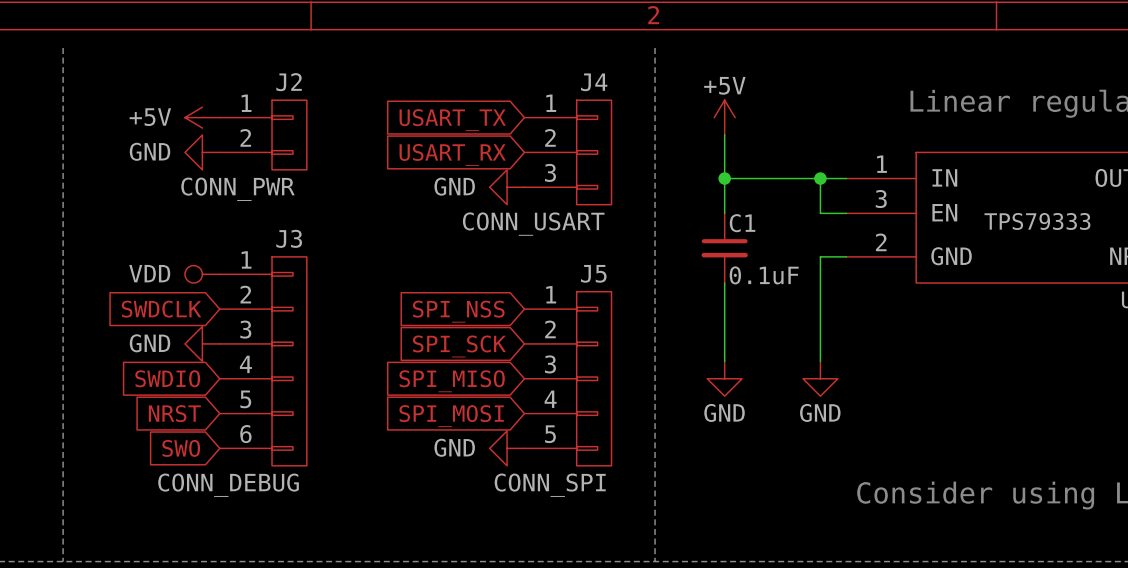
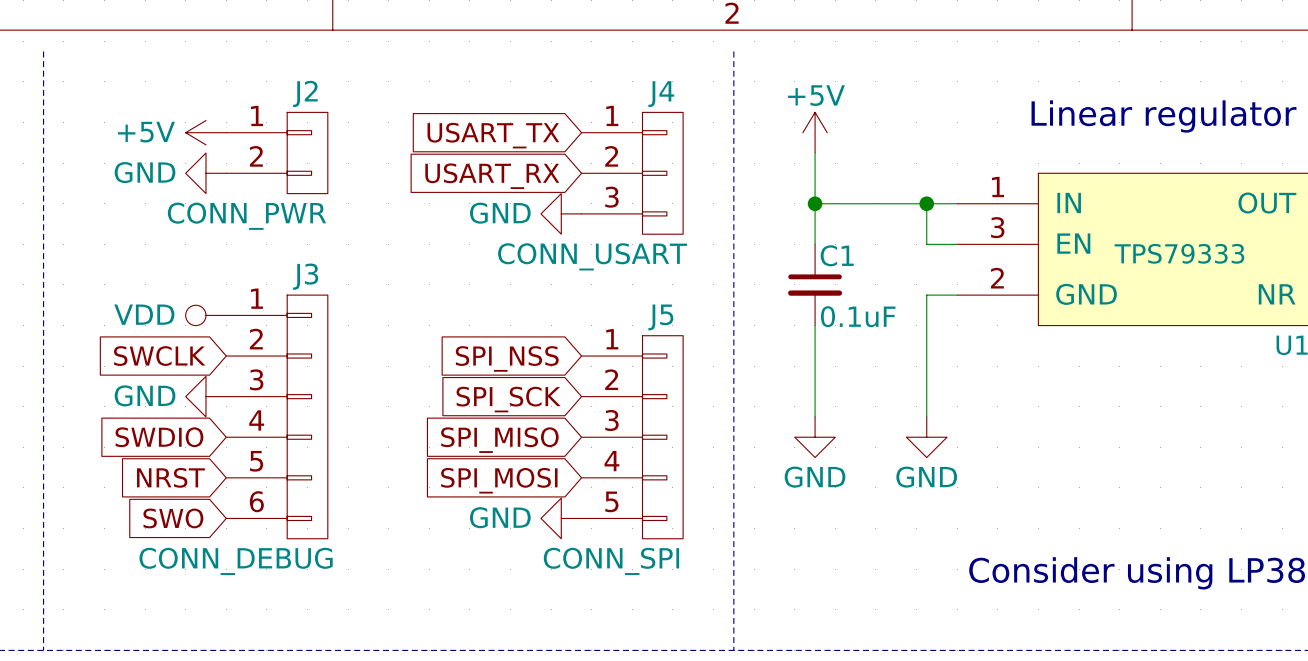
global label: SWDCLK (161, 309) -> SWCLK (159, 356)

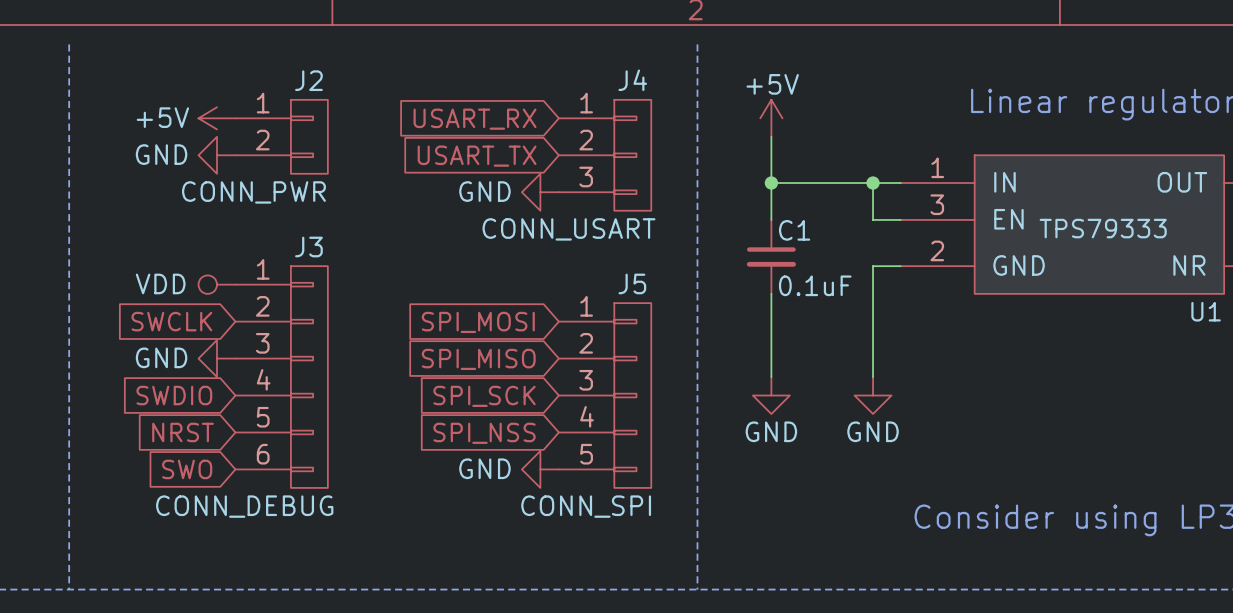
global label: USART_TX (493, 135) -> USART_RX (475, 119)
global label: USART_RX (492, 176) -> USART_TX (477, 156)
global label: SPI_NSS (507, 358) -> SPI_MOSI (478, 322)
global label: SPI_SCK (508, 399) -> SPI_MISO (478, 359)
global label: SPI_MISO (499, 440) -> SPI_SCK (484, 396)
global label: SPI_MOSI (499, 480) -> SPI_NSS (484, 433)

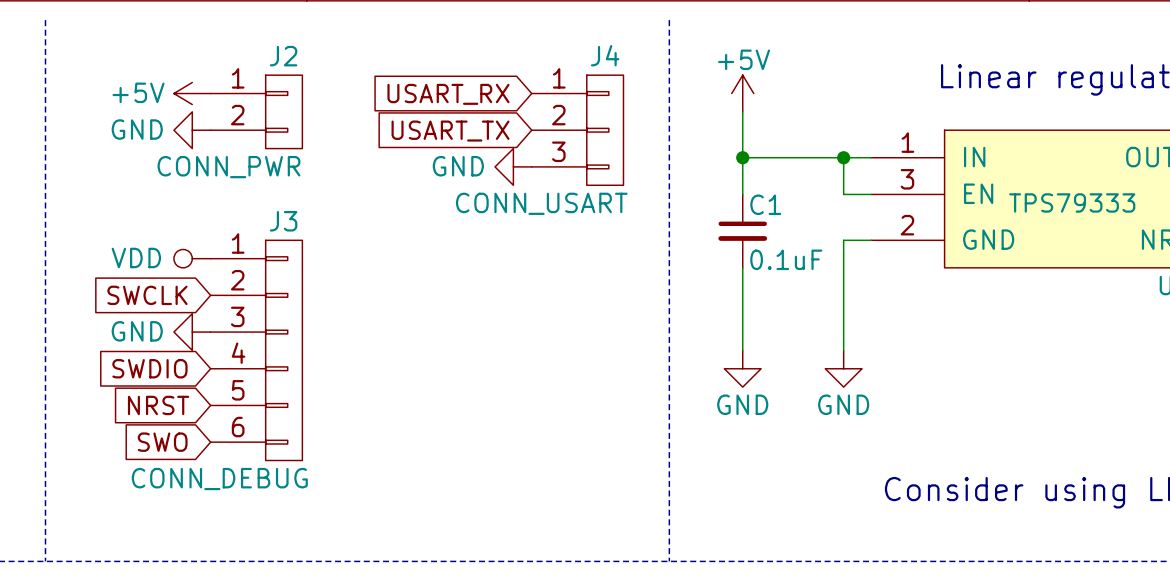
global label: SPI_MOSI (478, 322) -> none
global label: SPI_MISO (478, 359) -> none
J5: CONN_SPI (605, 395) -> none
global label: SPI_SCK (484, 396) -> none
global label: SPI_NSS (484, 433) -> none
power symbol: GND (540, 469) -> none

